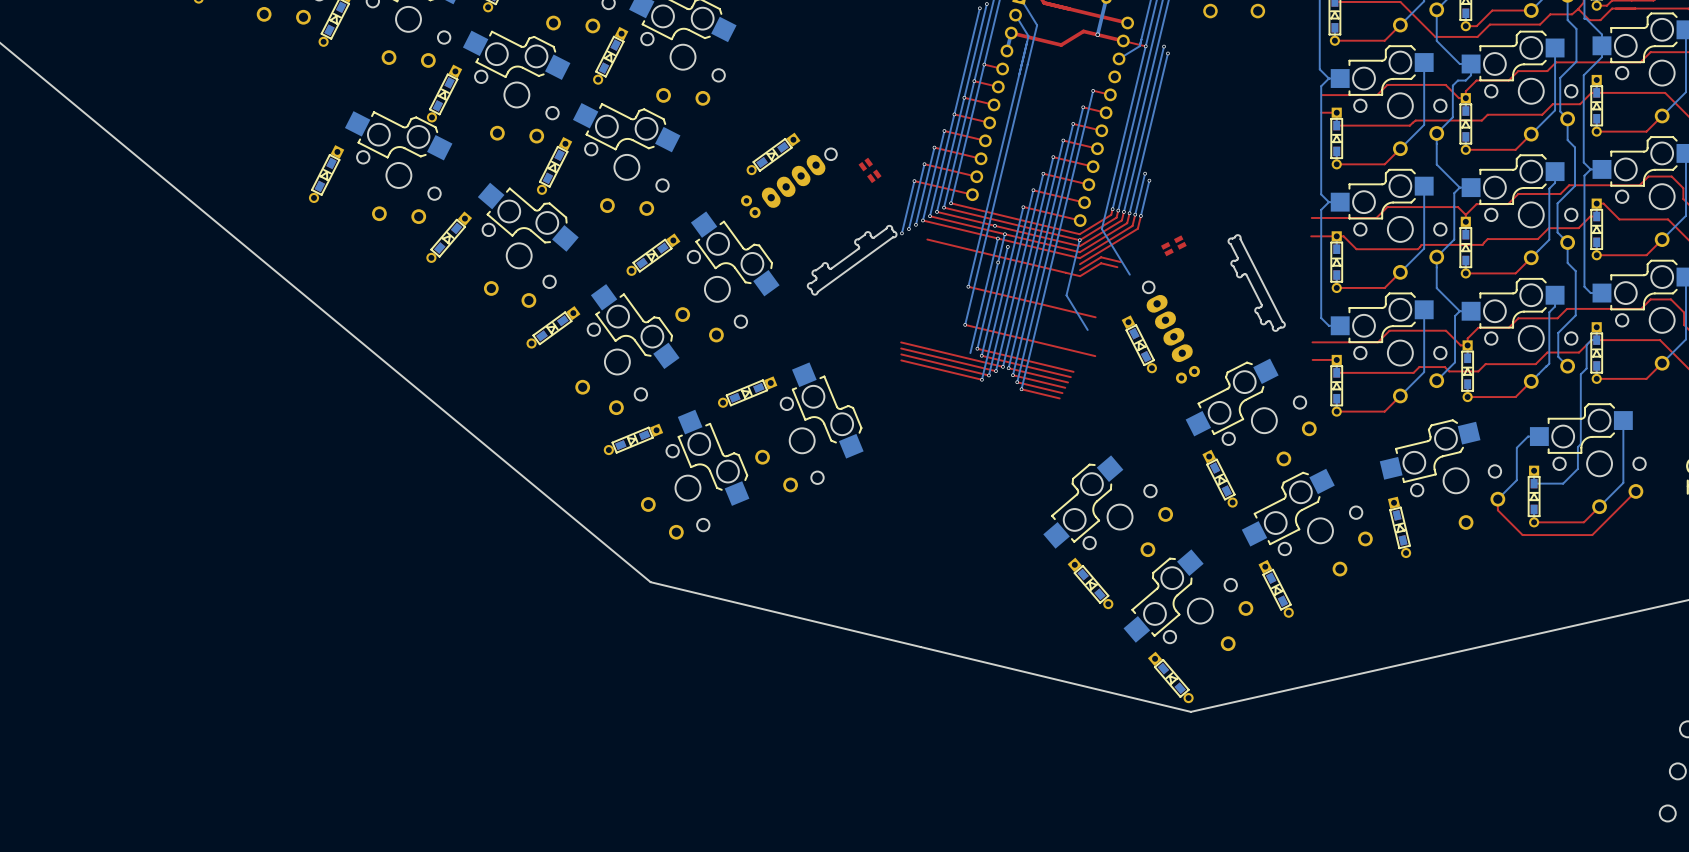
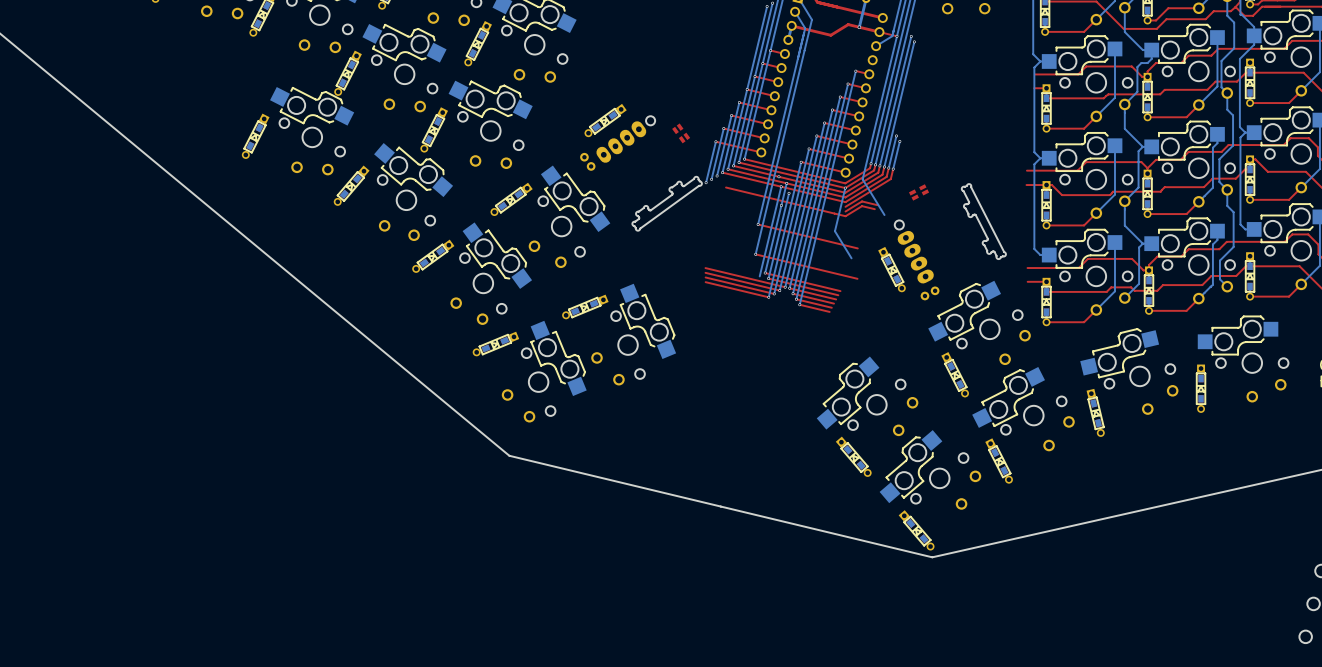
bottom track: (1596, 340) (1591, 340) (1586, 344) (1586, 368) (1580, 374) (1580, 444) (1577, 447) (1577, 468) (1563, 483) (1534, 483) (1534, 470) -> none
bottom track: (1623, 420) (1623, 482) (1599, 506) -> none
bottom track: (1539, 436) (1528, 436) (1516, 447) (1516, 480) (1497, 499) -> none
top track: (1635, 491) (1592, 535) (1522, 535) (1497, 510) (1497, 499) -> none
top track: (1599, 506) (1583, 522) (1534, 522) (1534, 509) -> none

